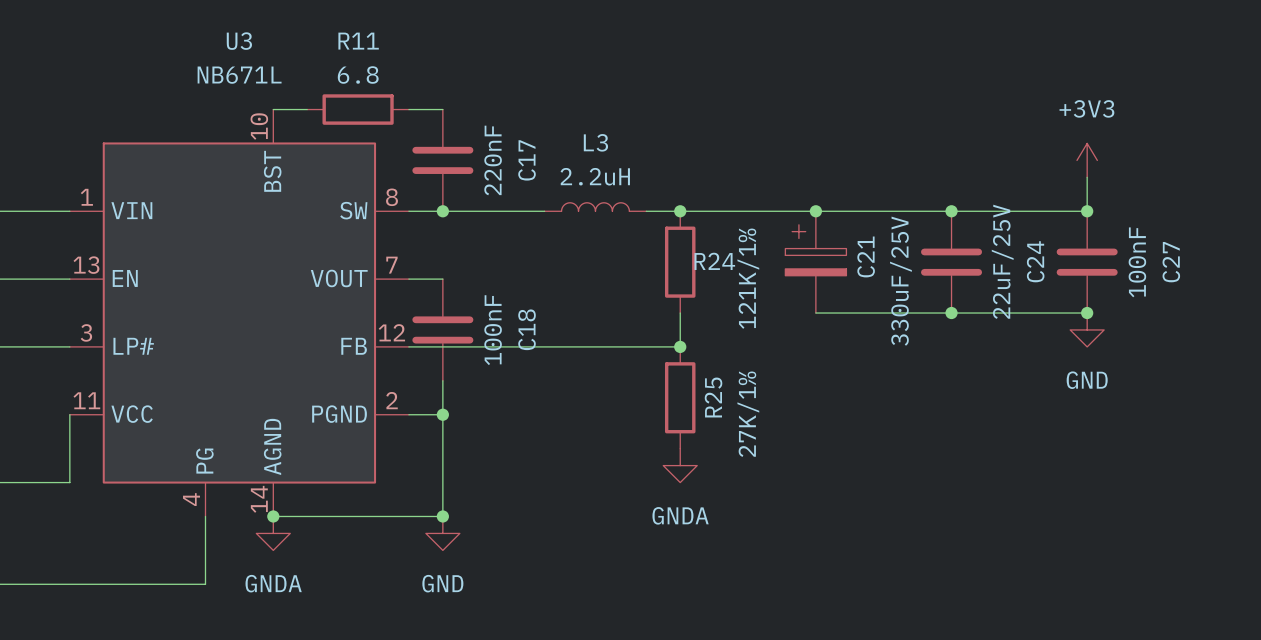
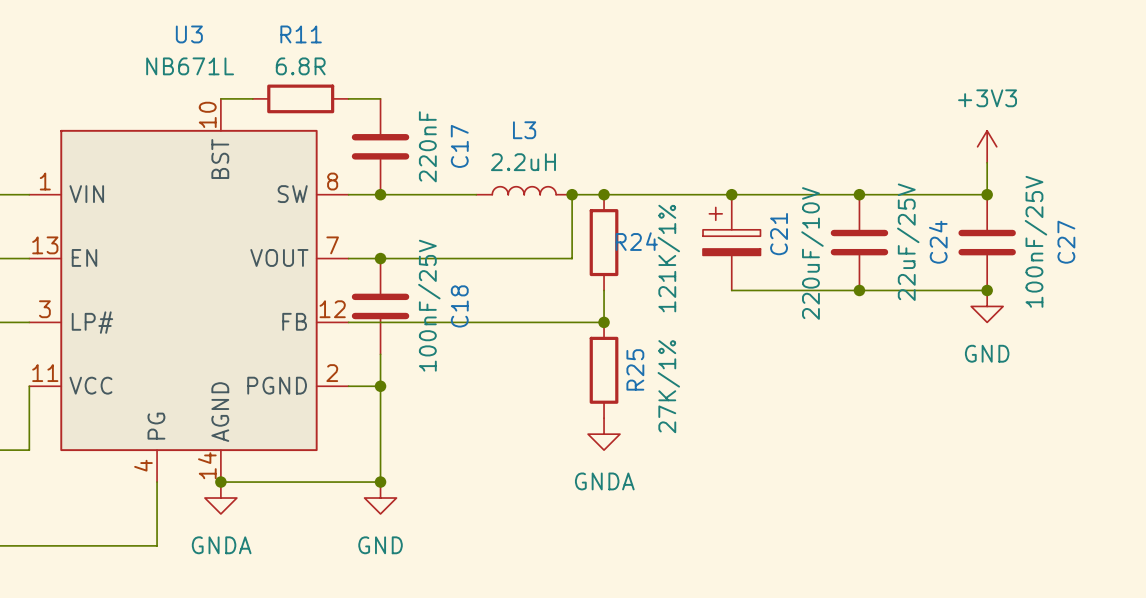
R11 value: 6.8 (358, 75) -> 6.8R (300, 66)
wire: none -> (572, 194) (572, 258) (380, 258)
junction: none -> (572, 194)
C27 value: 100nF (1137, 262) -> 100nF/25V (1035, 241)
junction: none -> (380, 258)
C21 value: 330uF/25V (900, 281) -> 220uF/10V (812, 253)
C18 value: 100nF (493, 330) -> 100nF/25V (429, 305)

